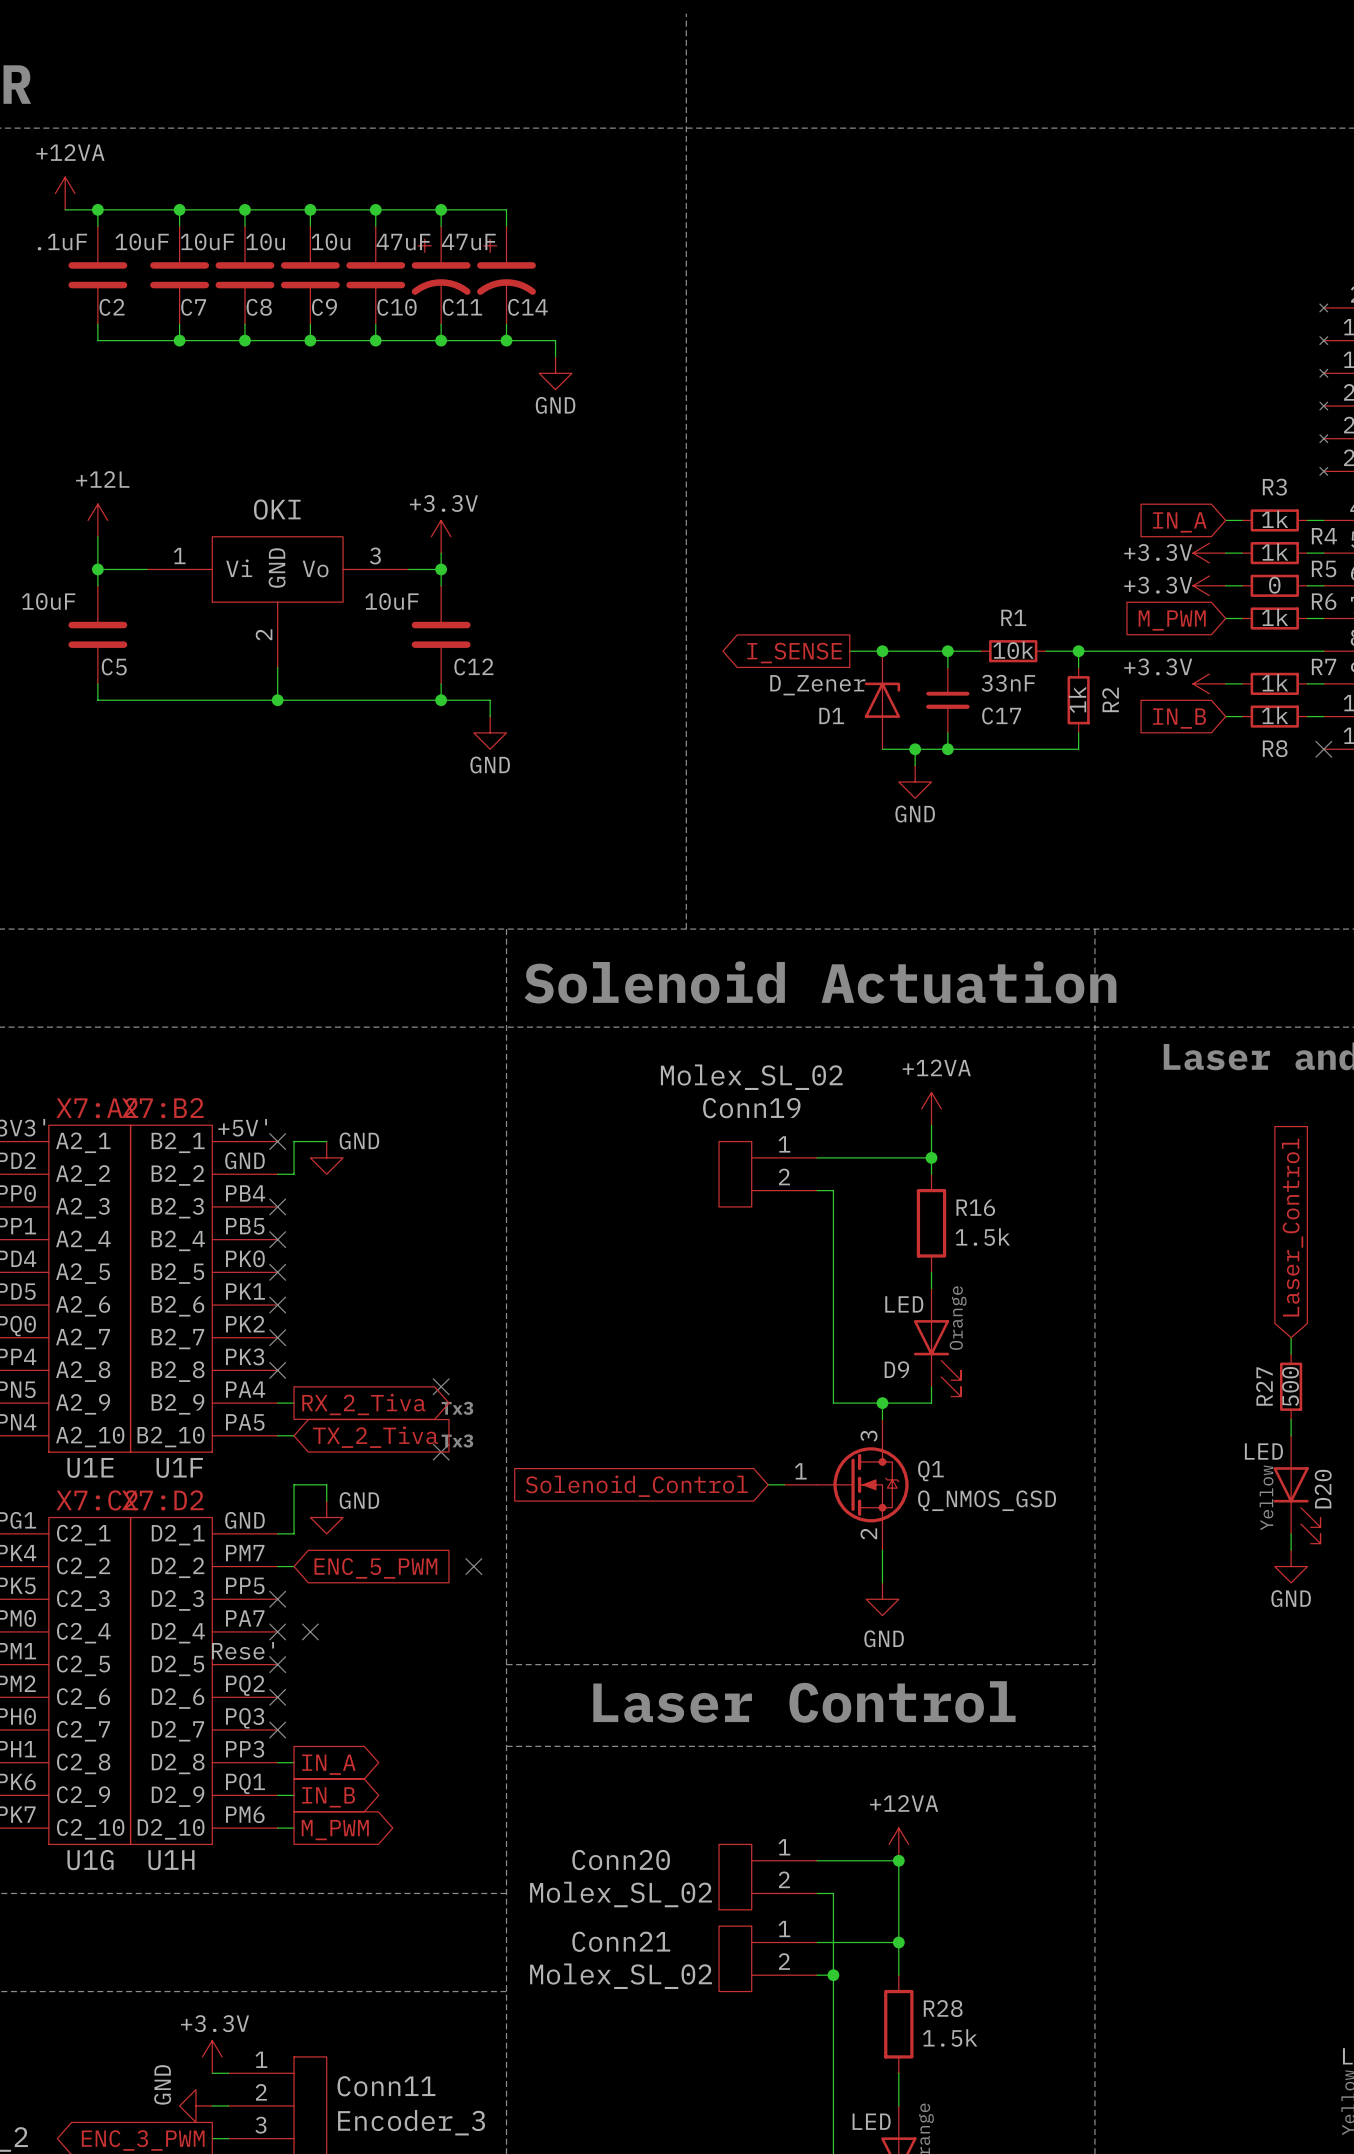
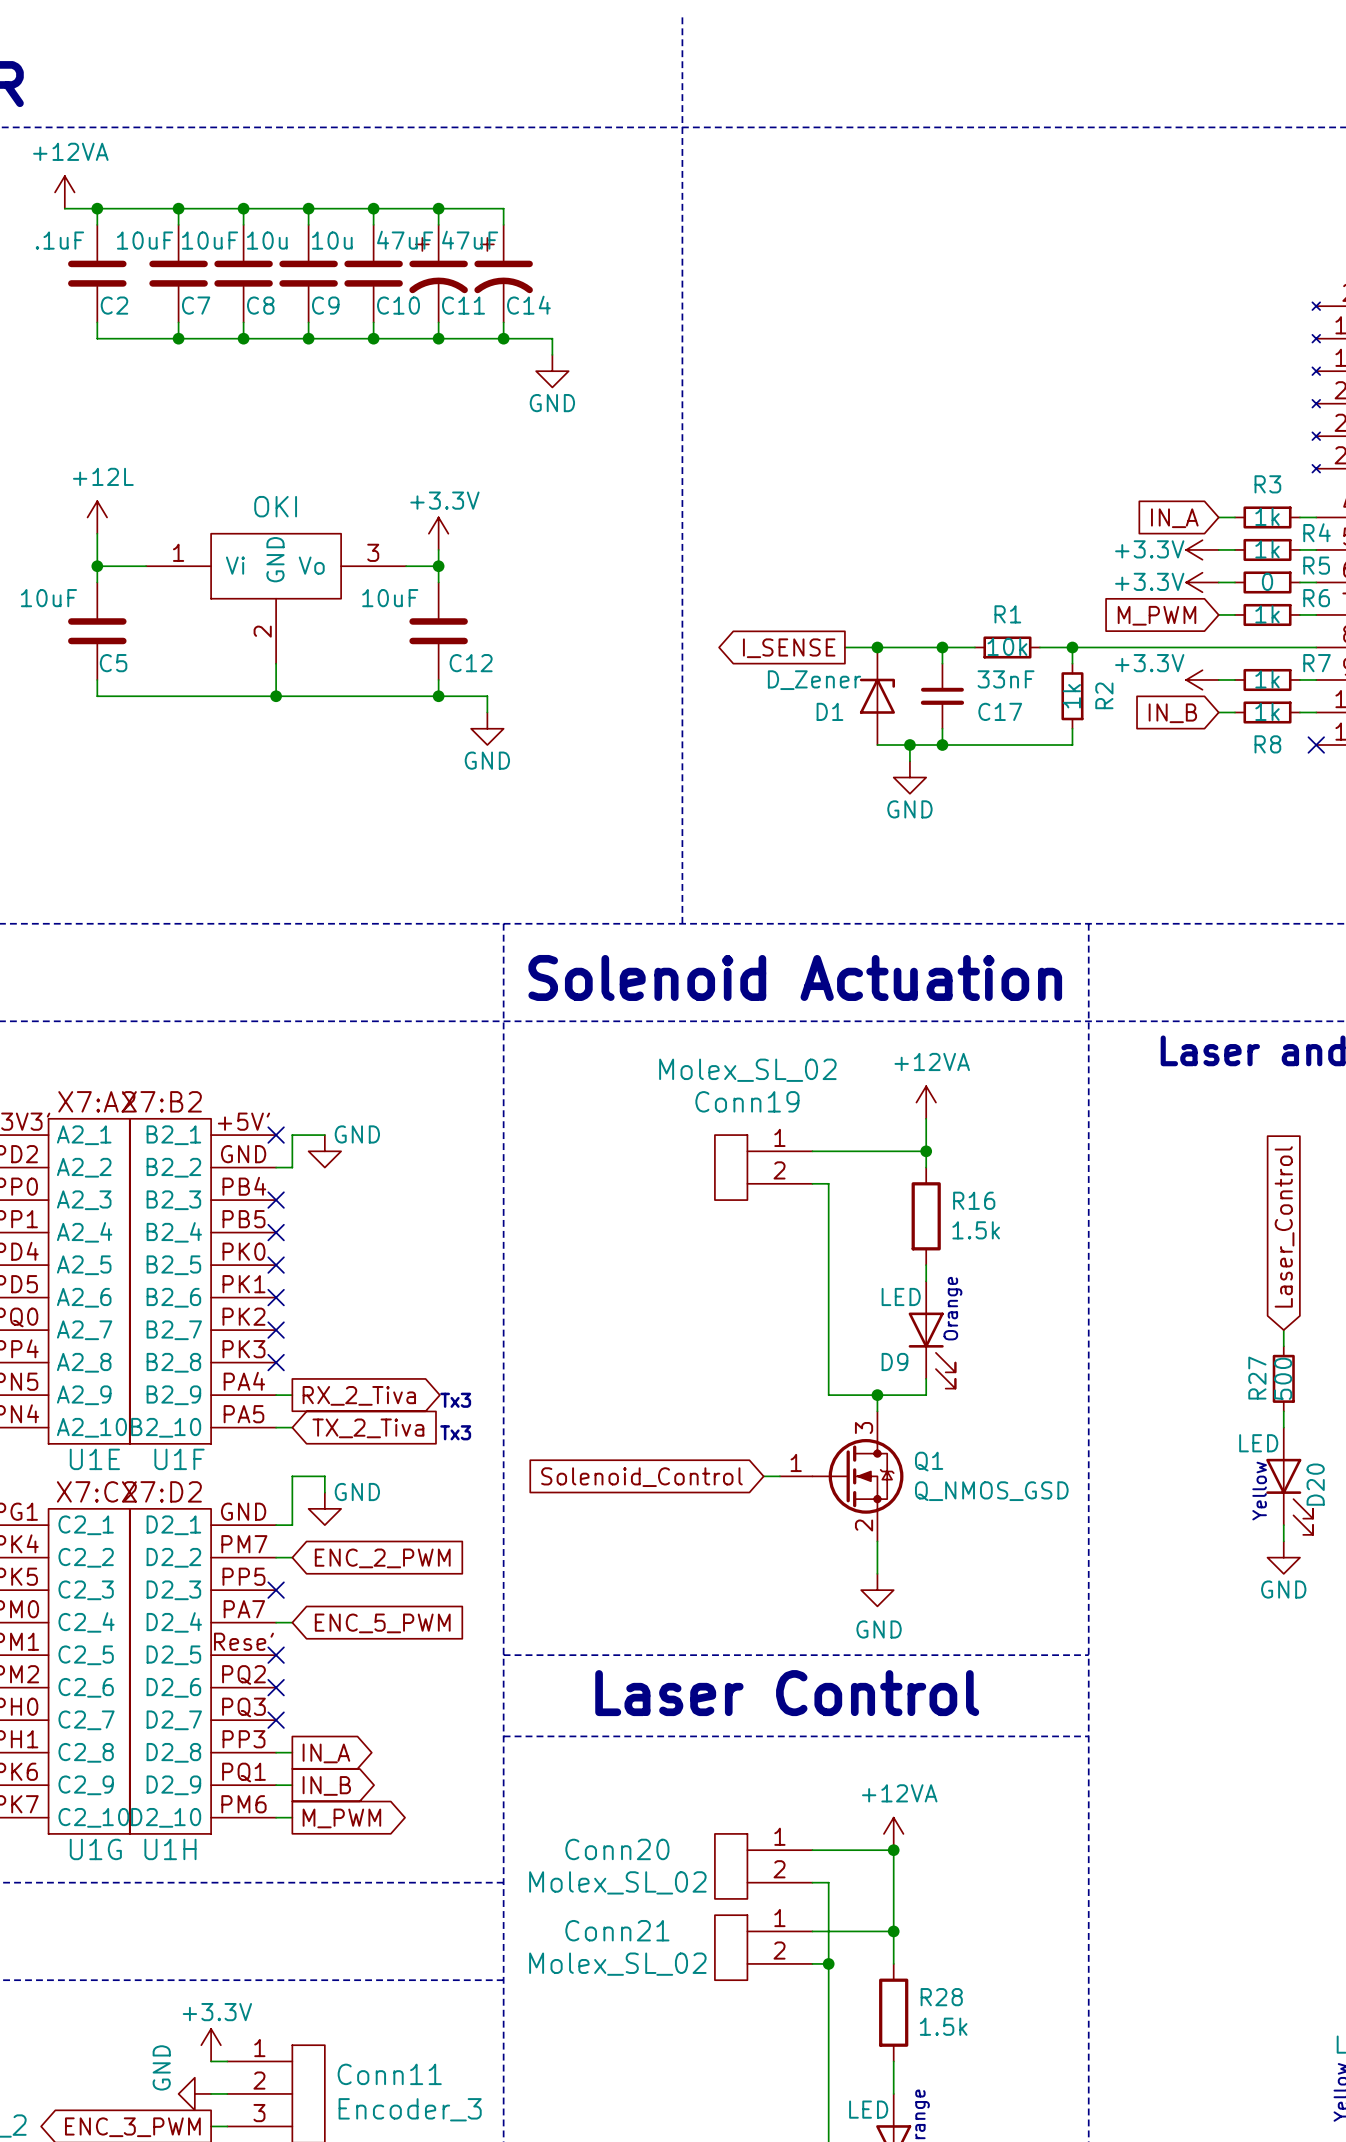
no-connect mark: (441, 1386) -> none
no-connect mark: (441, 1452) -> none
no-connect mark: (473, 1566) -> none
global label: ENC_5_PWM (375, 1568) -> ENC_2_PWM (382, 1558)
wire: none -> (276, 1622) (292, 1622)
no-connect mark: (277, 1631) -> none
no-connect mark: (310, 1631) -> none
global label: none -> ENC_5_PWM (382, 1623)

